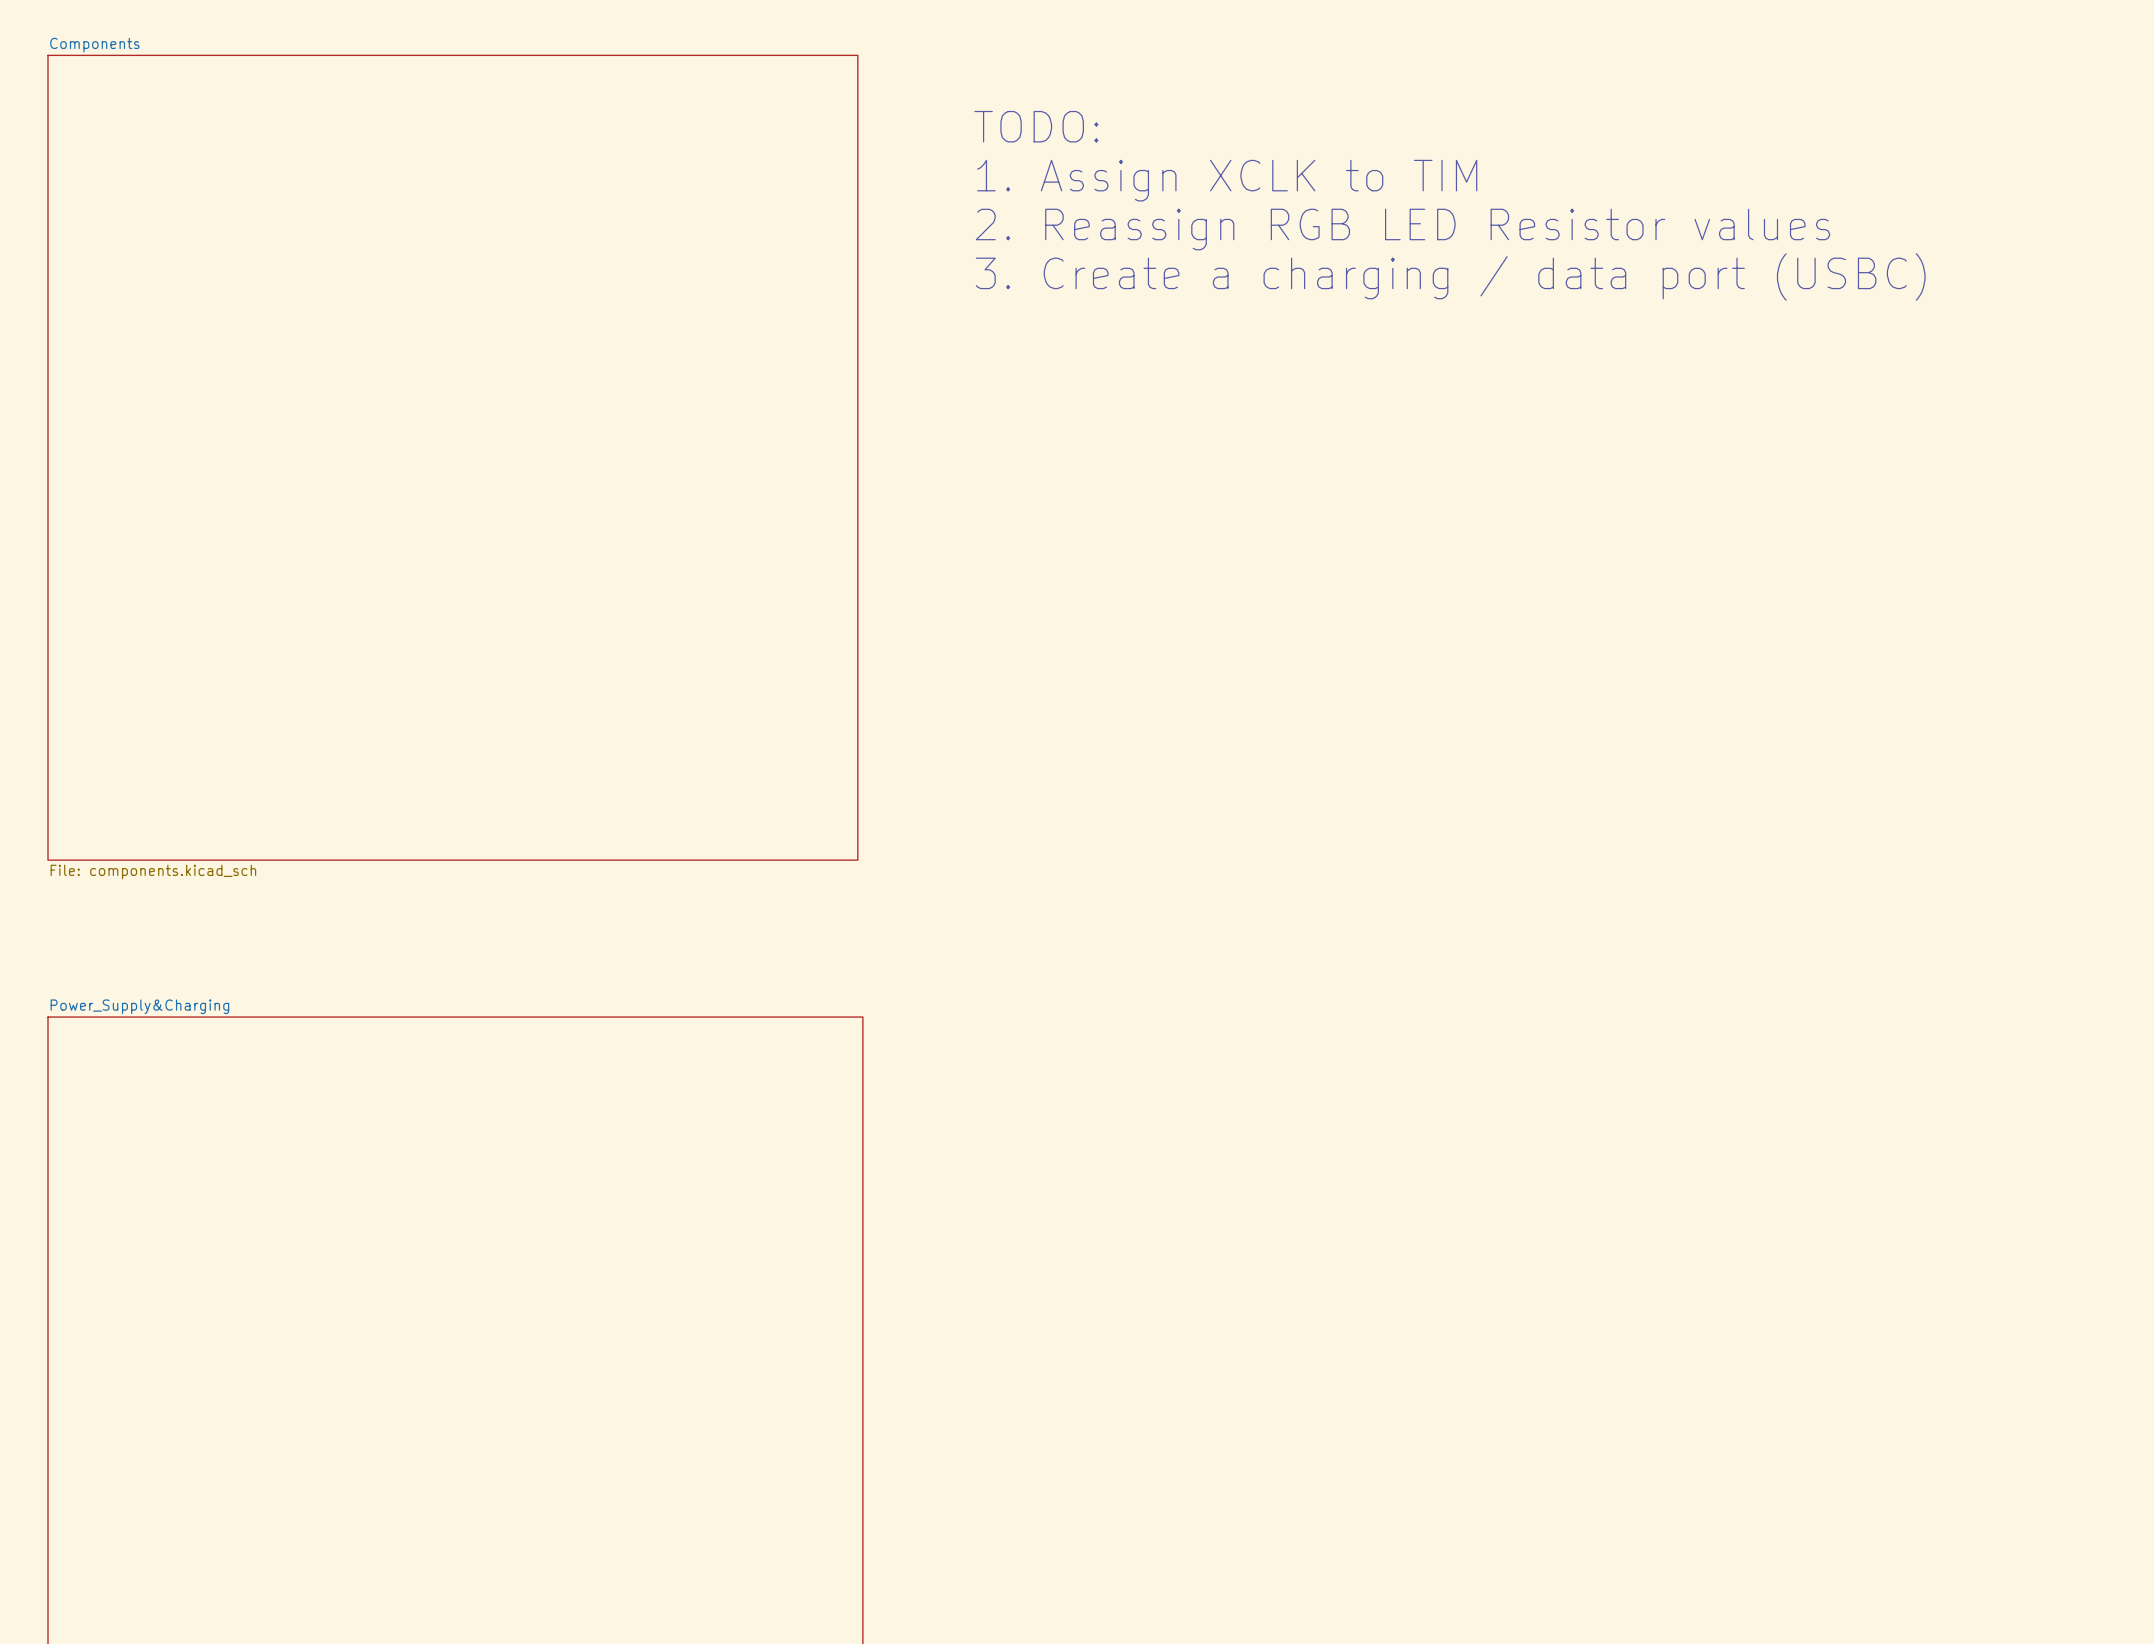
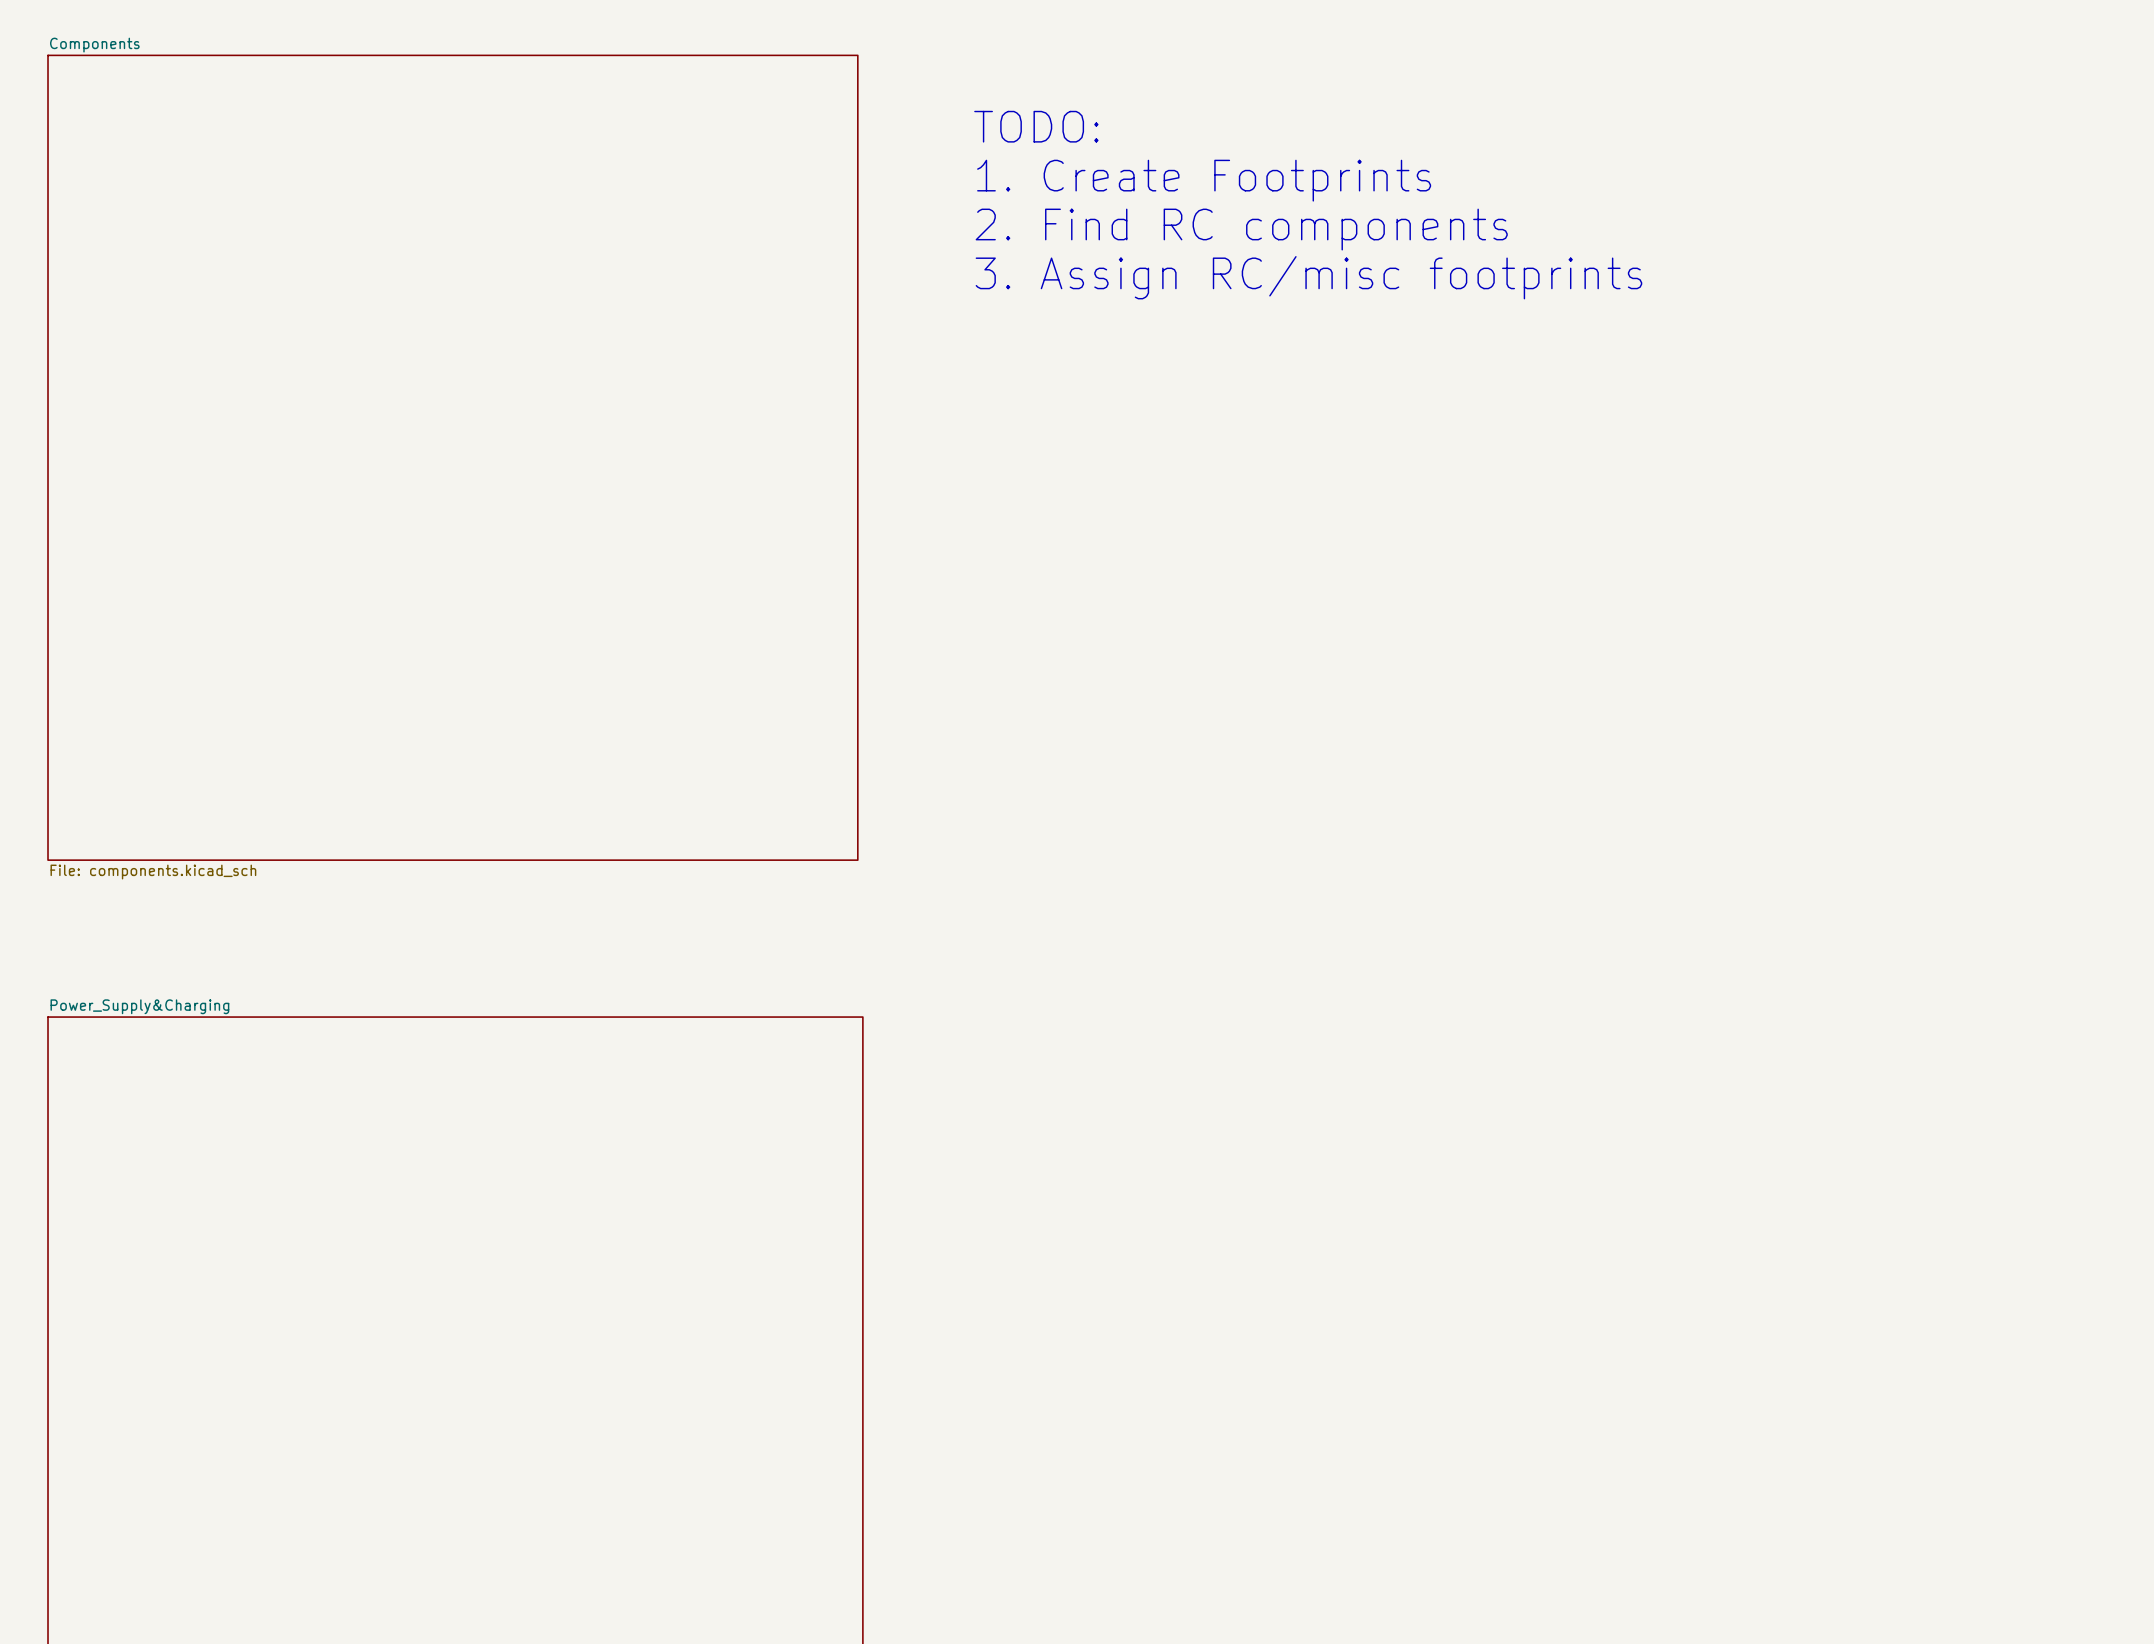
text: 1. Assign XCLK to TIM (1227, 180) -> 1. Create Footprints (1204, 180)
text: 2. Reassign RGB LED Resistor values (1402, 229) -> 2. Find RC components (1241, 229)
text: 3. Create a charging / data port (USBC) (1450, 277) -> 3. Assign RC/misc footprints (1308, 277)

